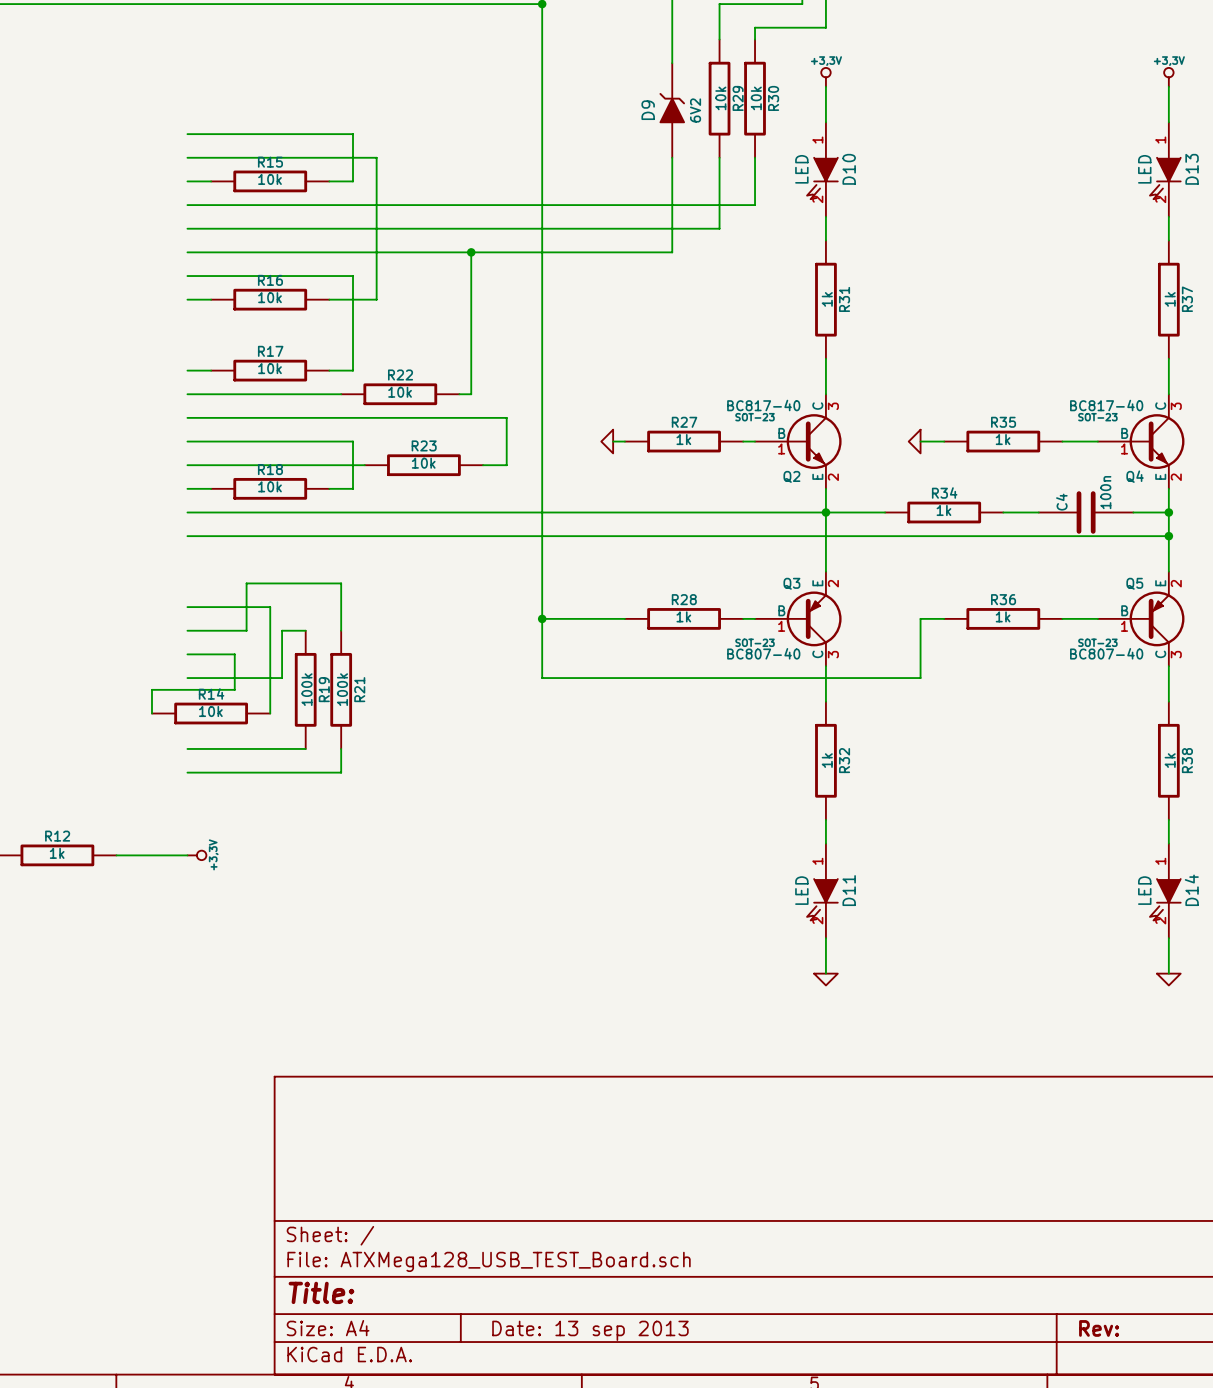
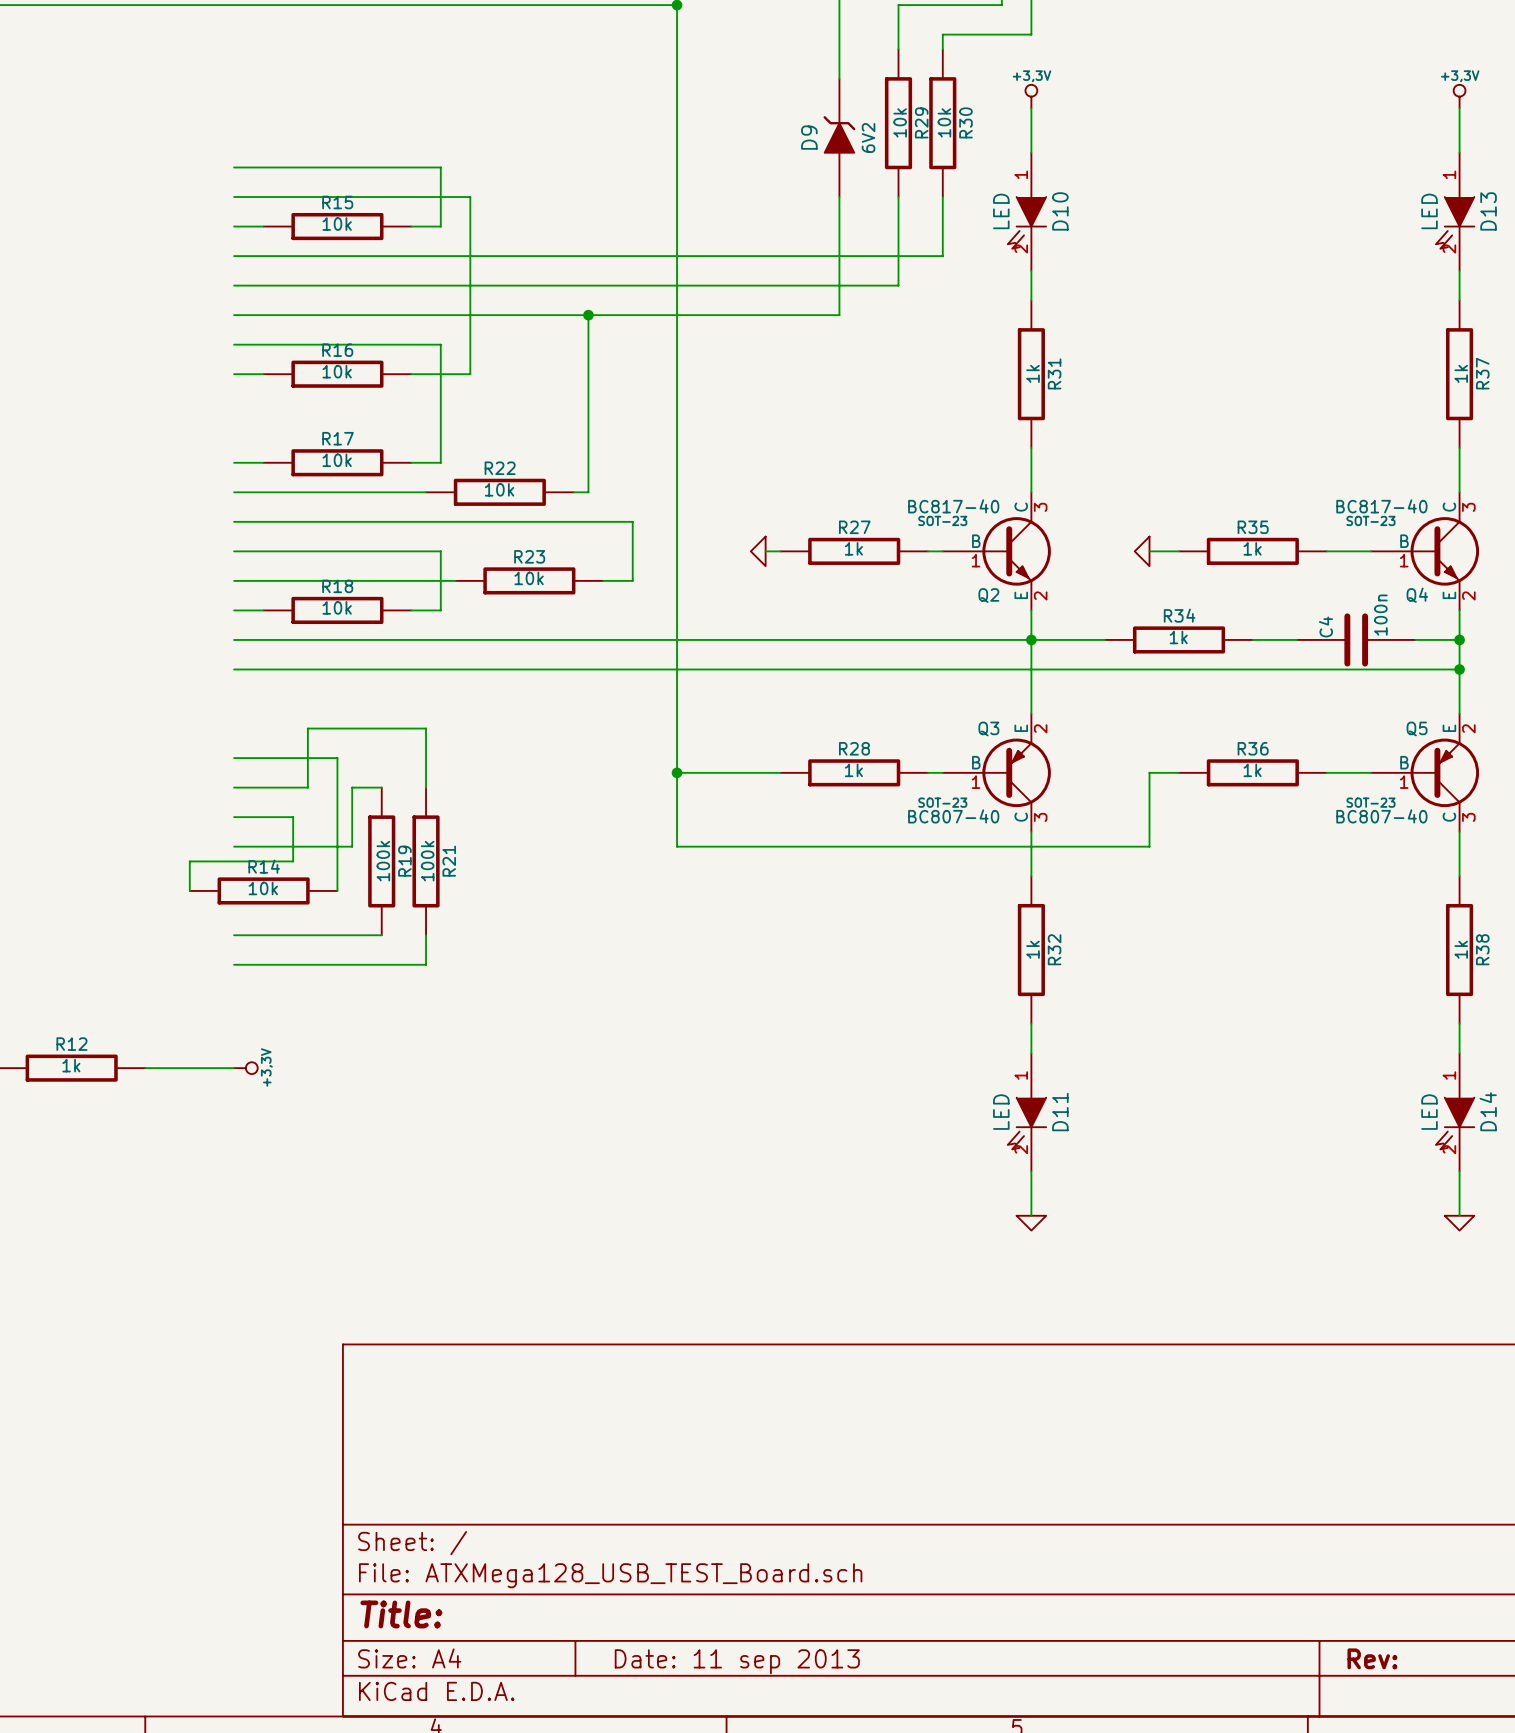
title block: Date: 13 sep 2013 (590, 1330) -> Date: 11 sep 2013 (737, 1661)

